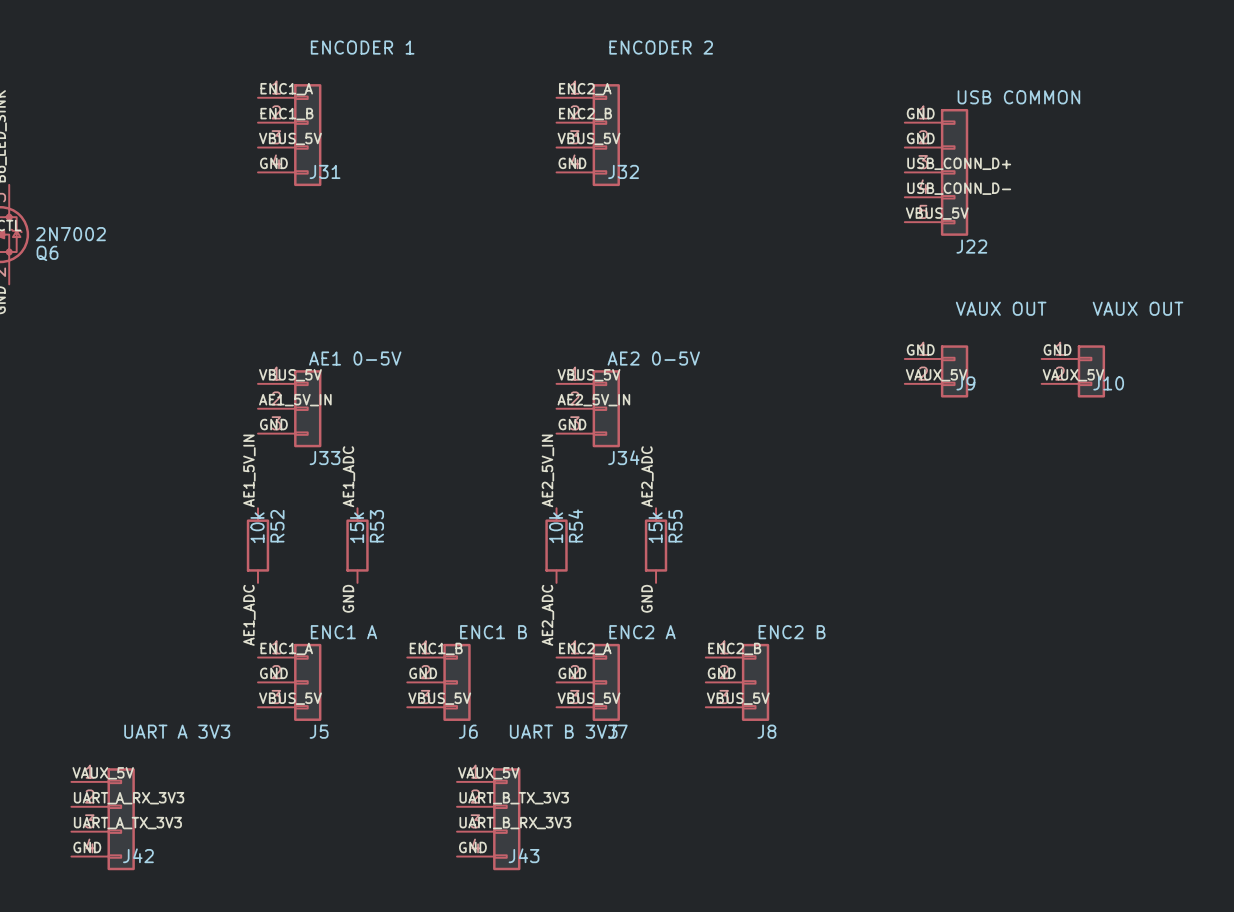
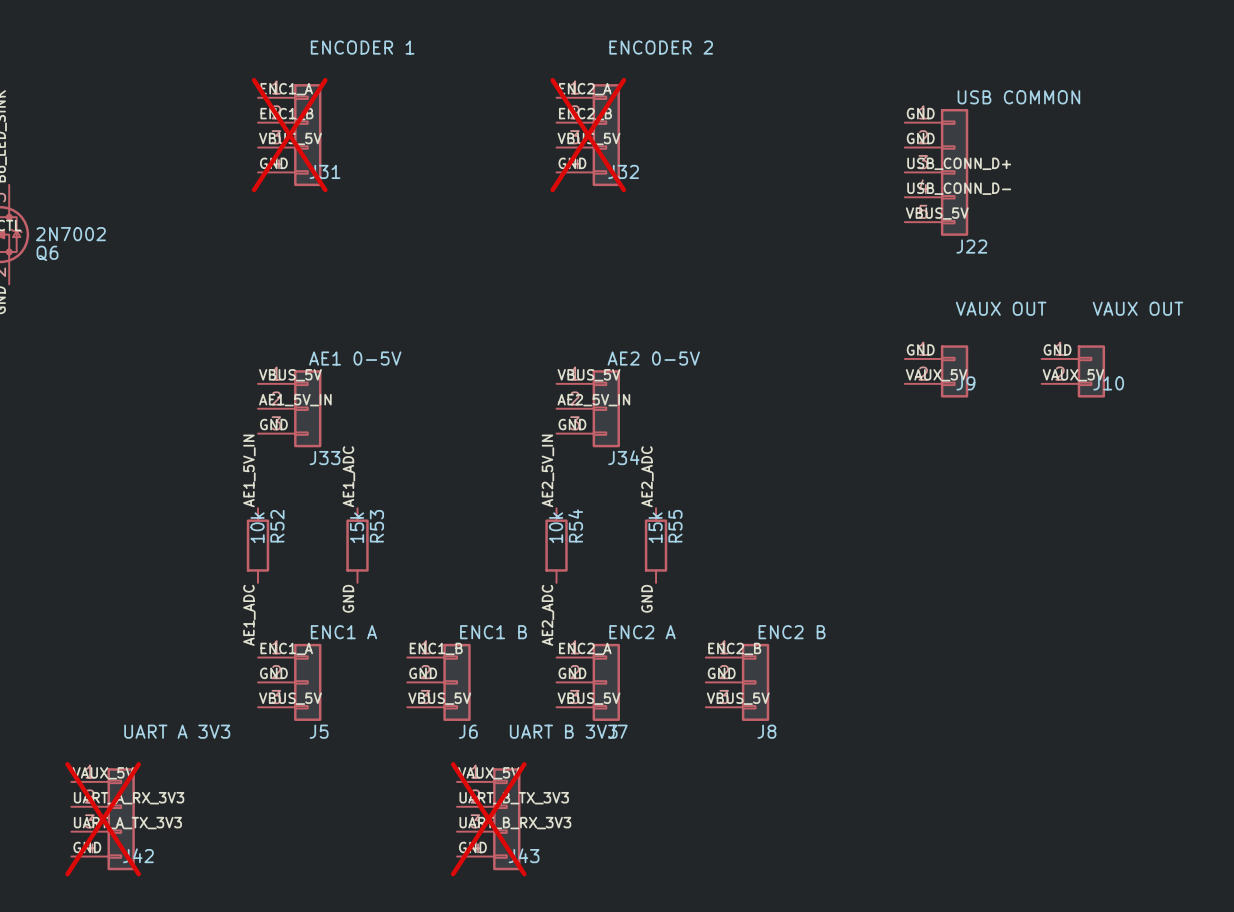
J31 do-not-place cross: none -> (289, 135)
J32 do-not-place cross: none -> (588, 135)
J42 do-not-place cross: none -> (103, 819)
J43 do-not-place cross: none -> (488, 819)

